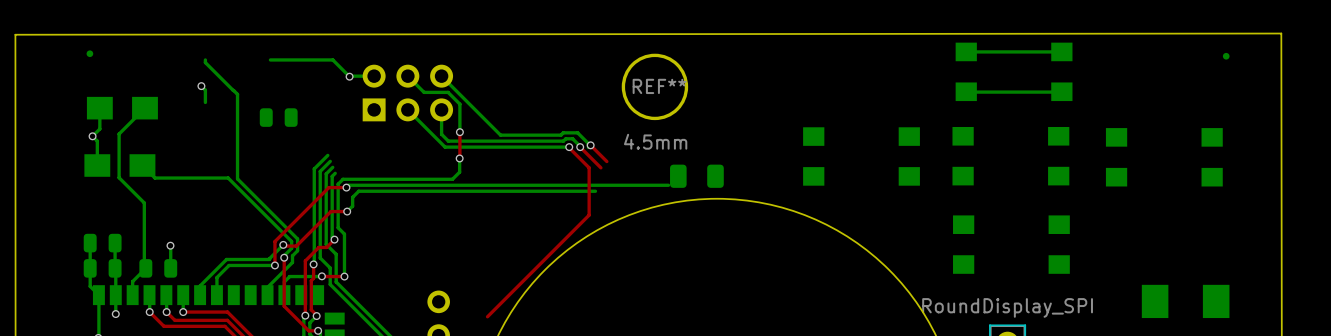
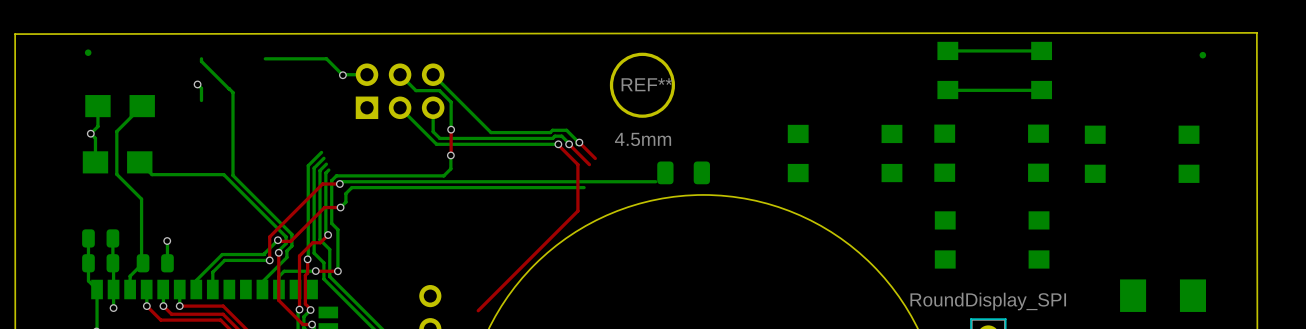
part: (278, 117) -> none

